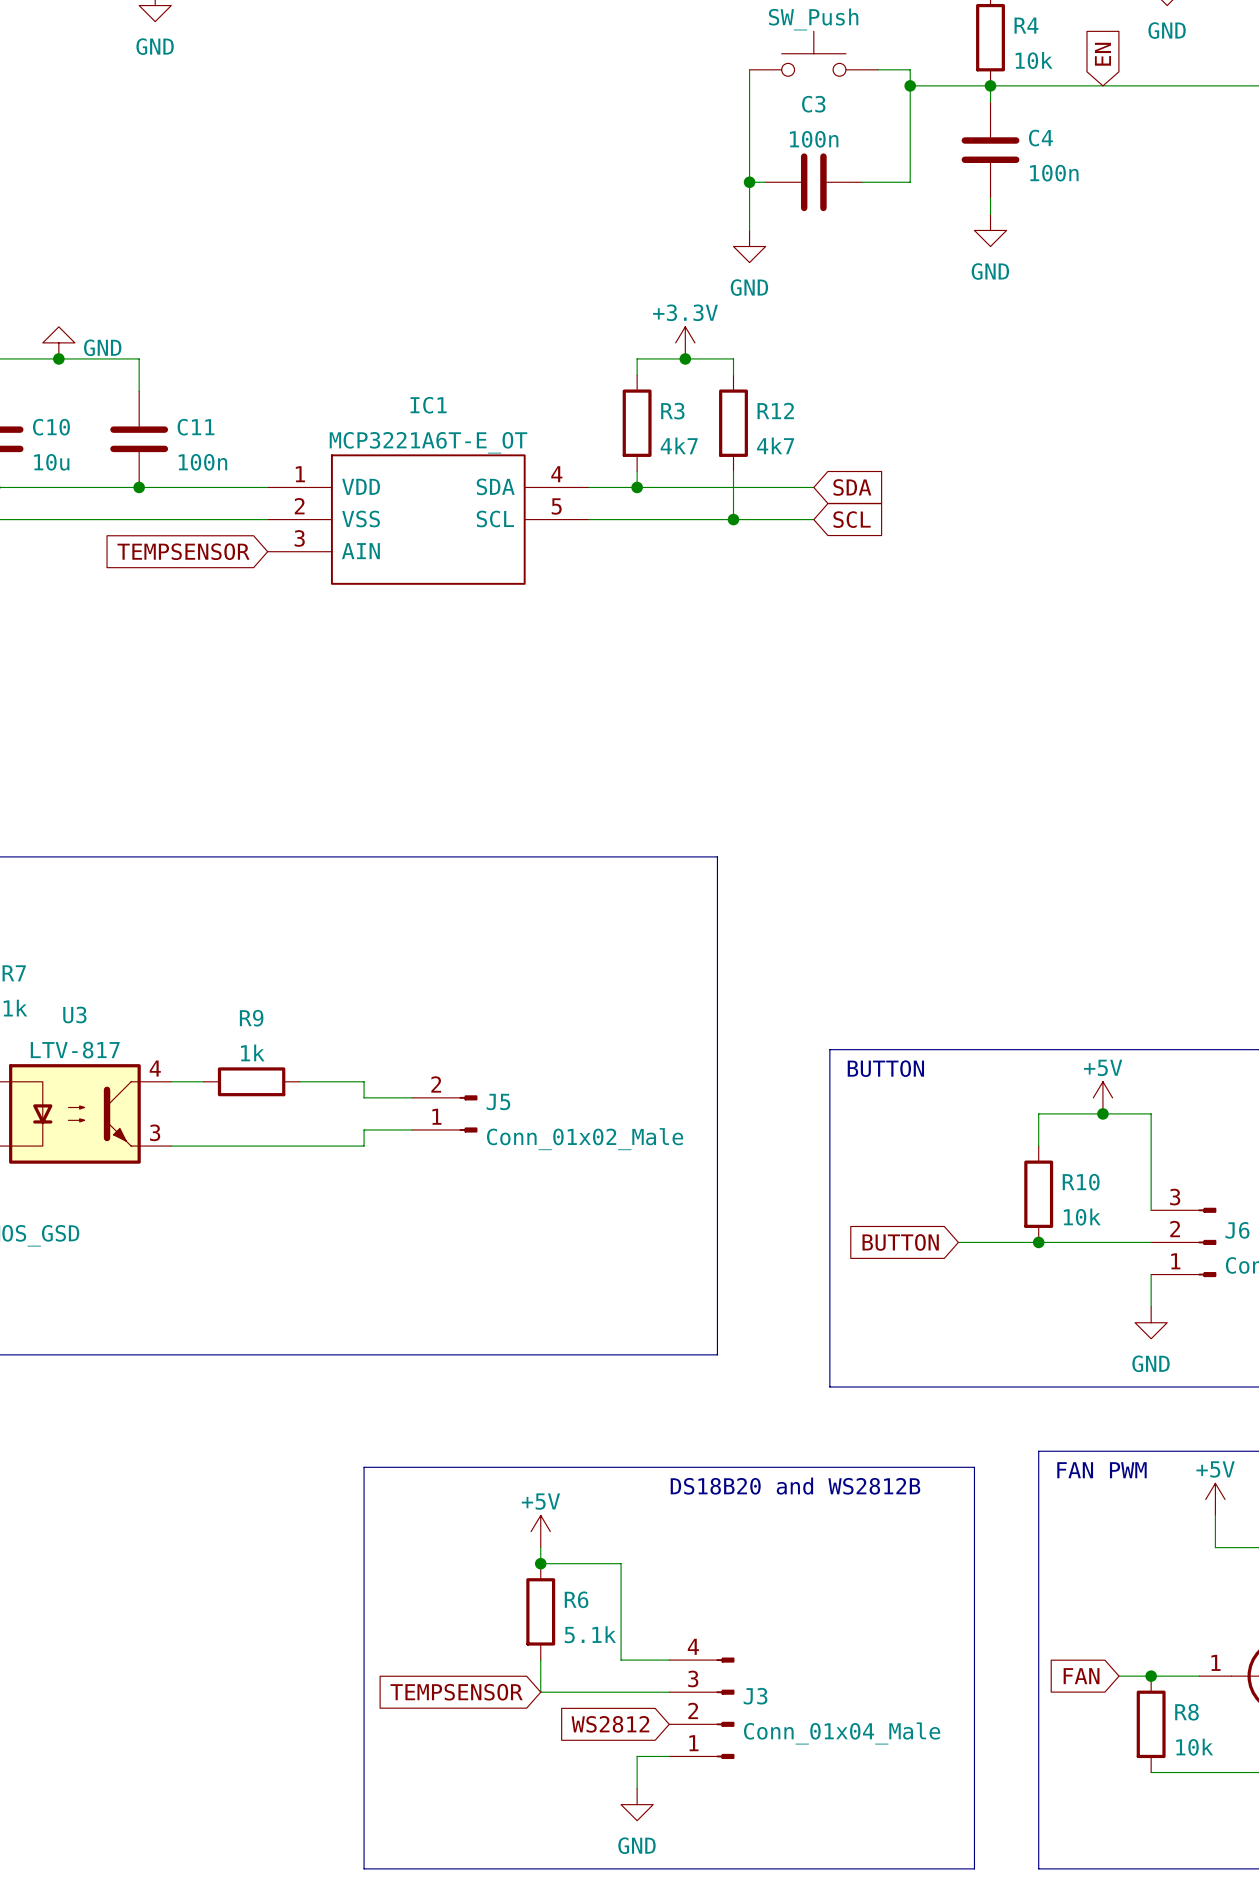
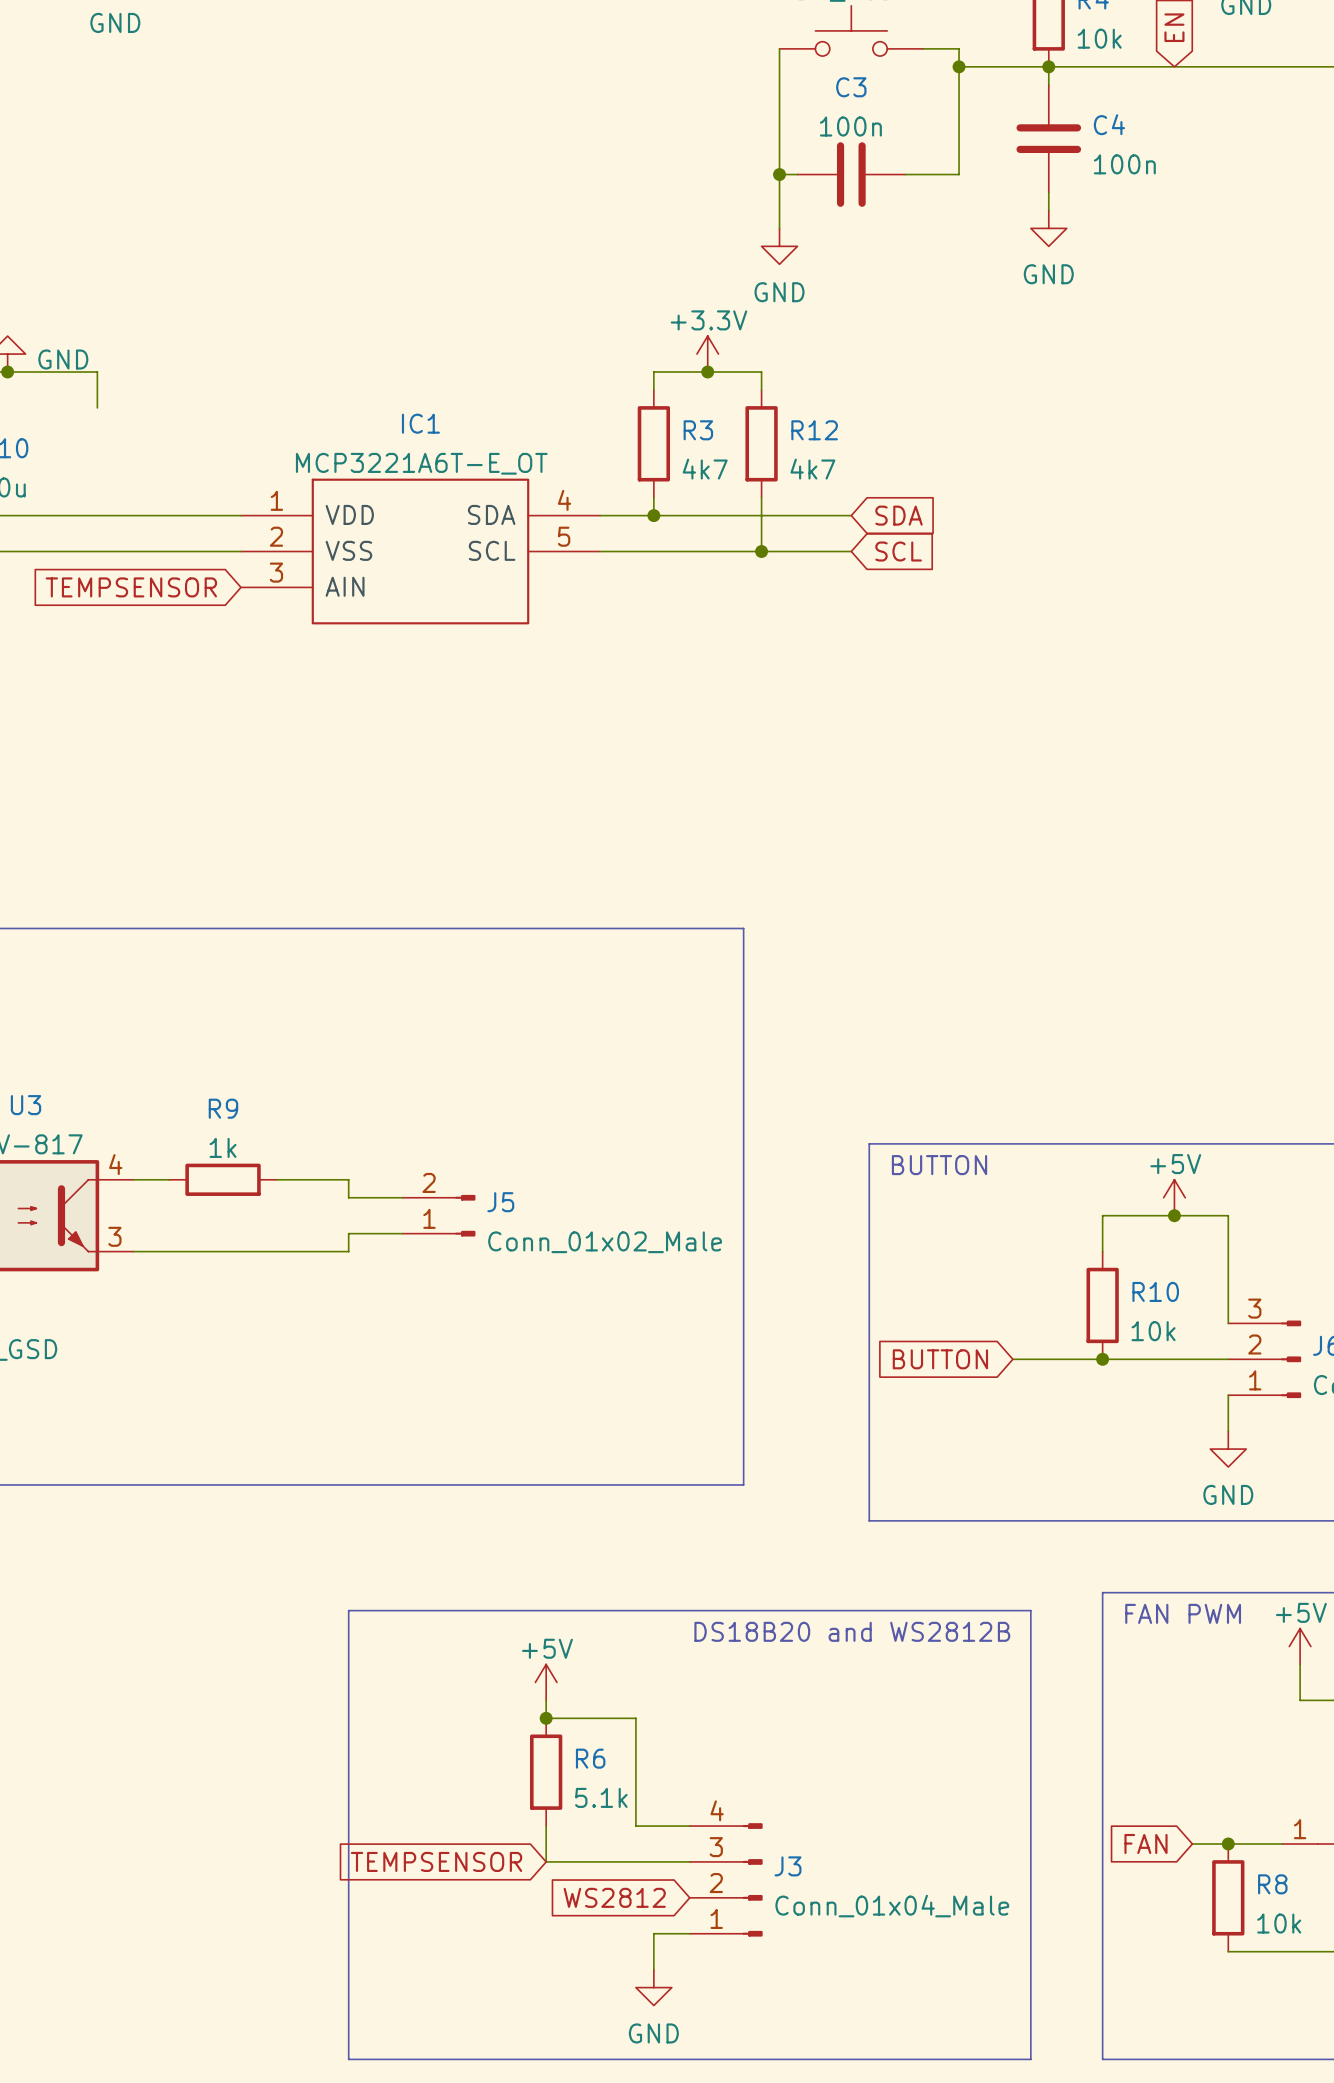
C11: 100n (139, 439) -> none
junction: (139, 487) -> none

